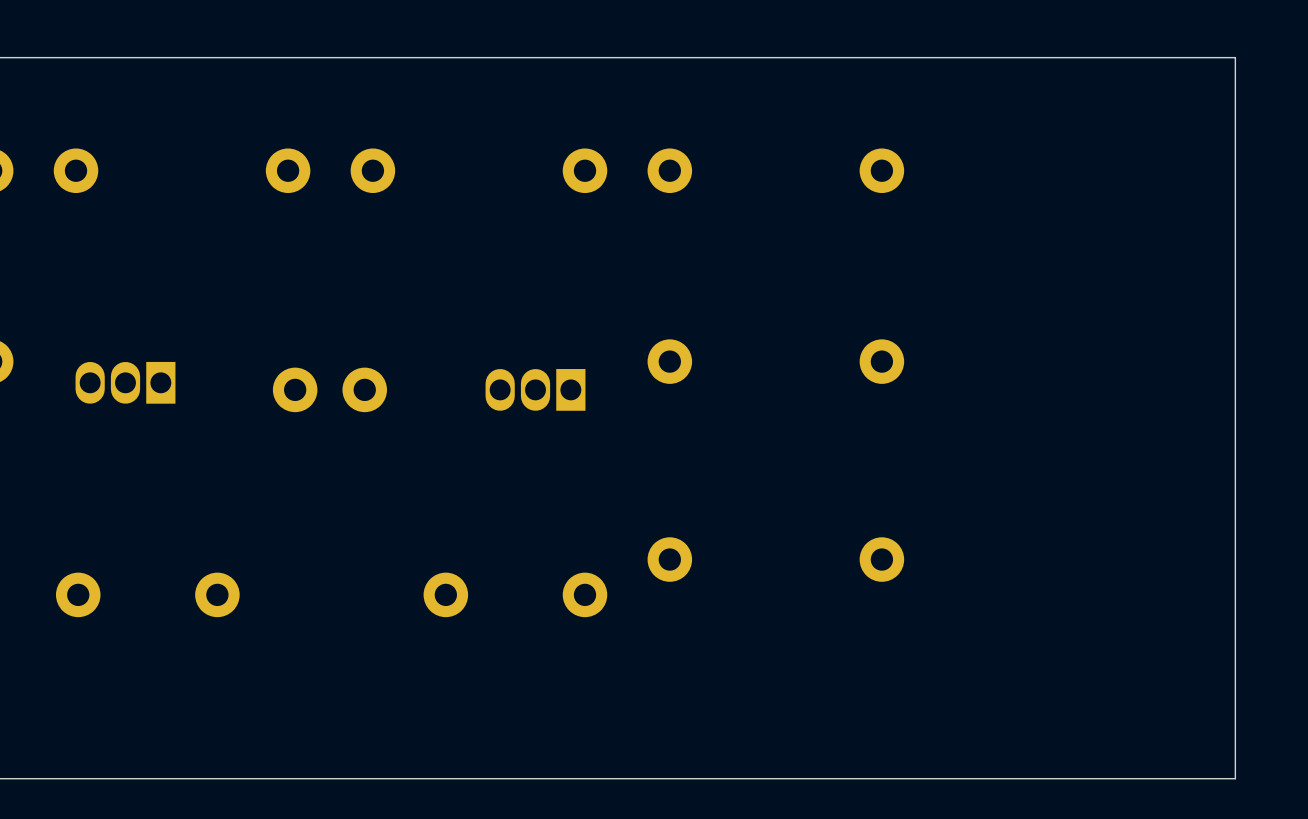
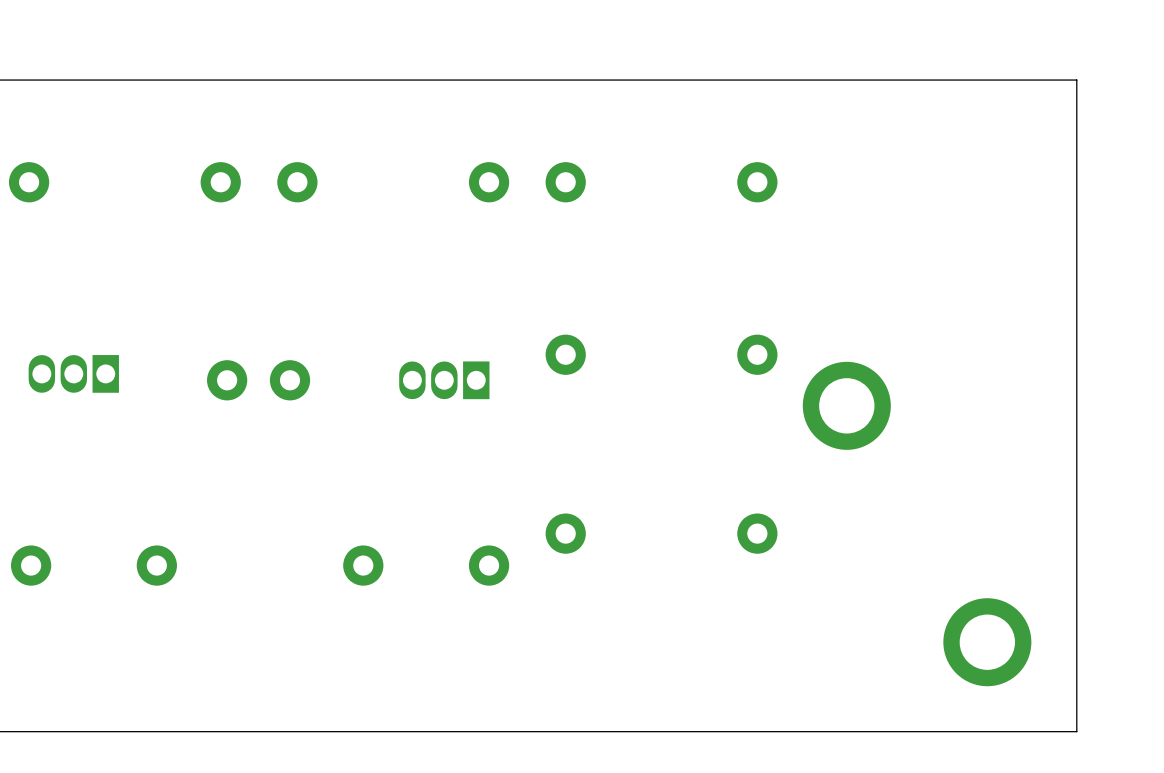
part: none -> (846, 405)
part: none -> (987, 642)

